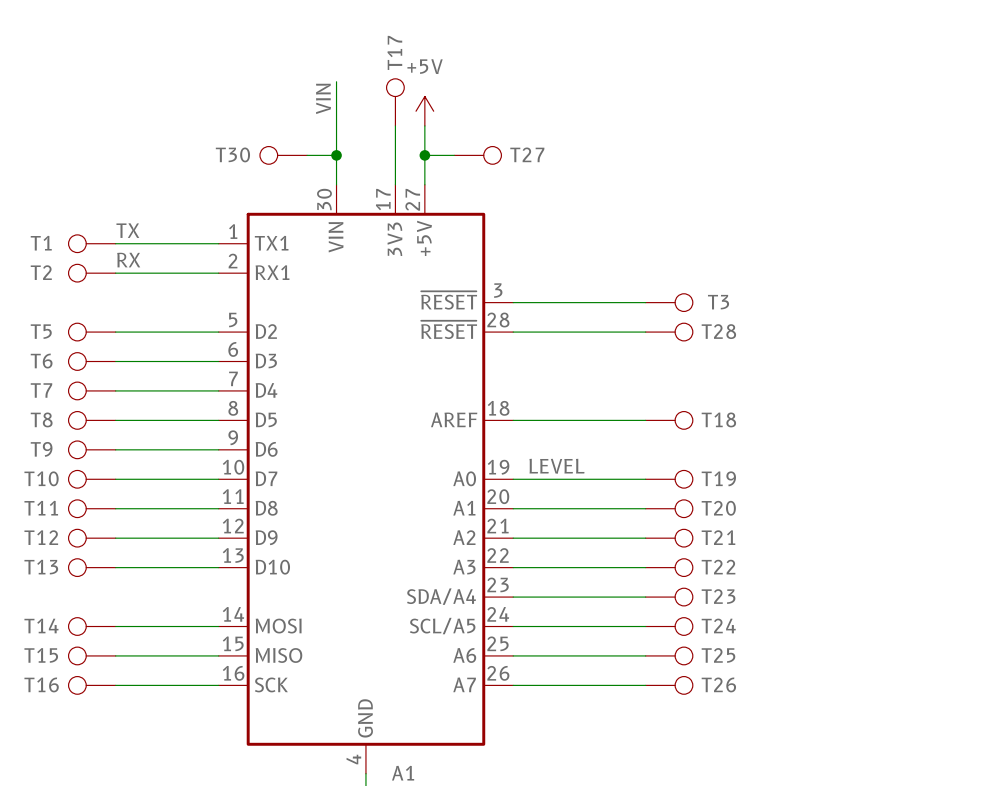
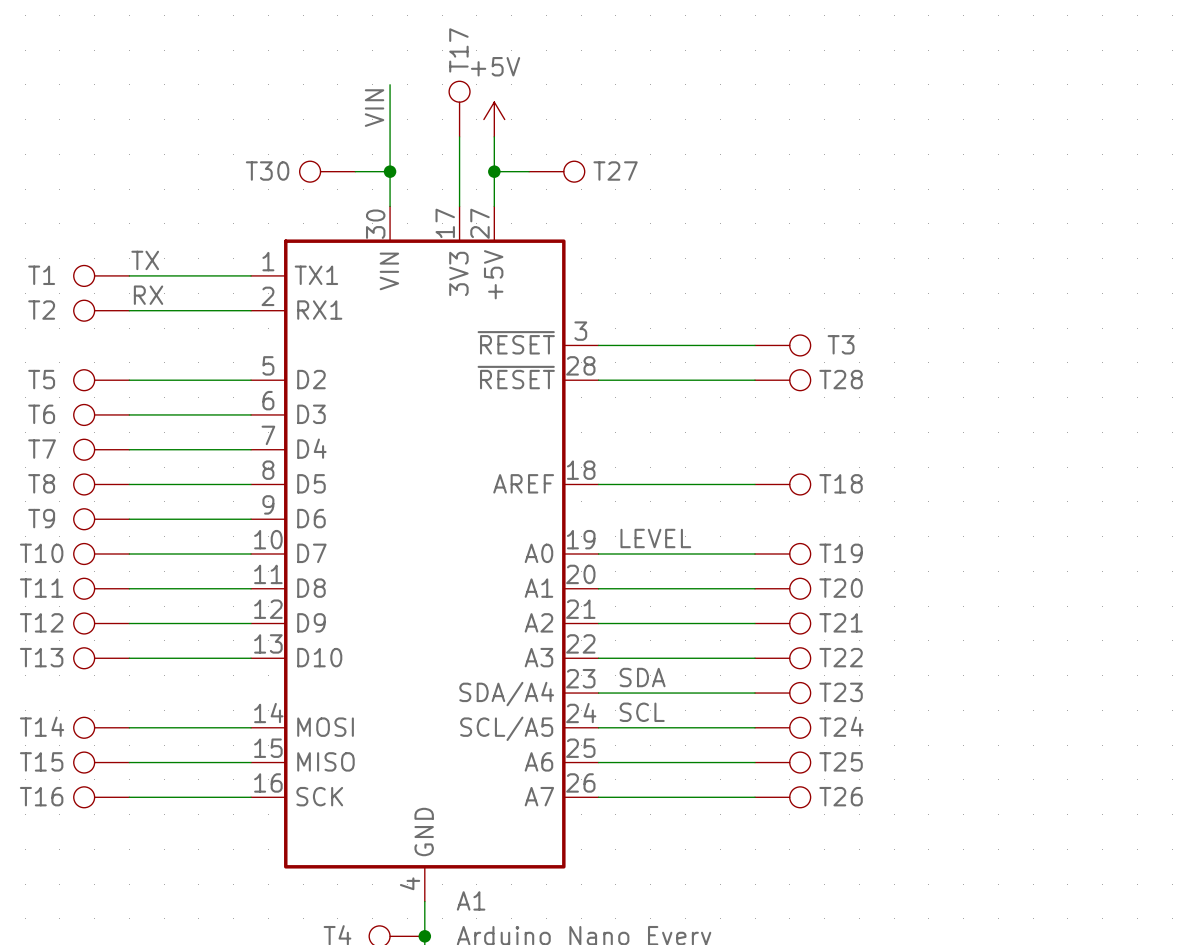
label: none -> SDA (642, 677)
label: none -> SCL (642, 712)

